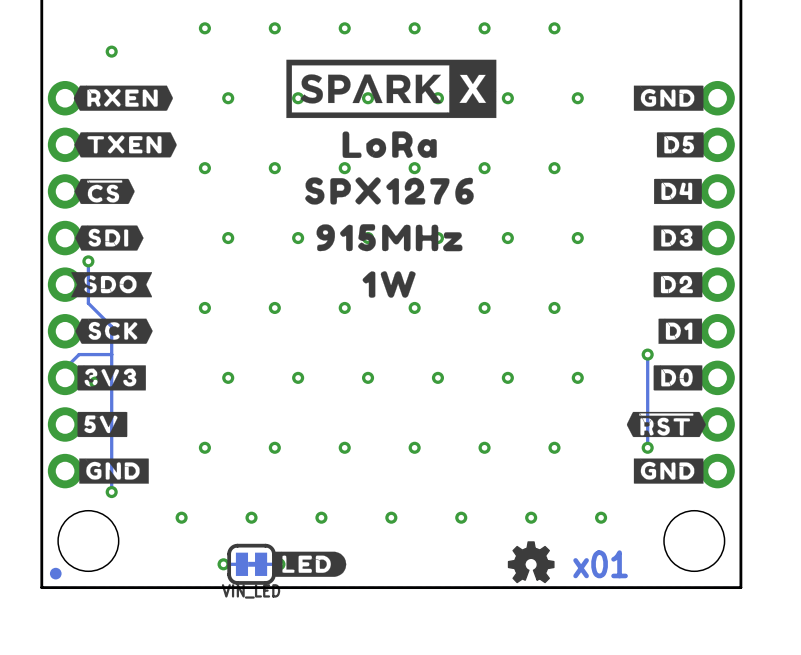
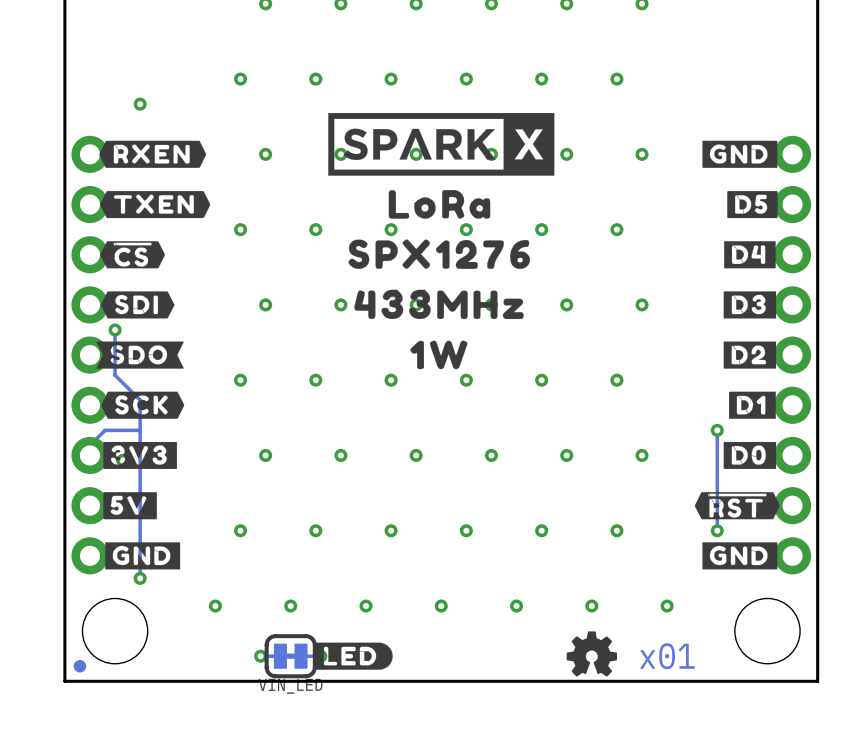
drawing shape: [316, 224, 463, 252] -> [354, 289, 524, 320]

